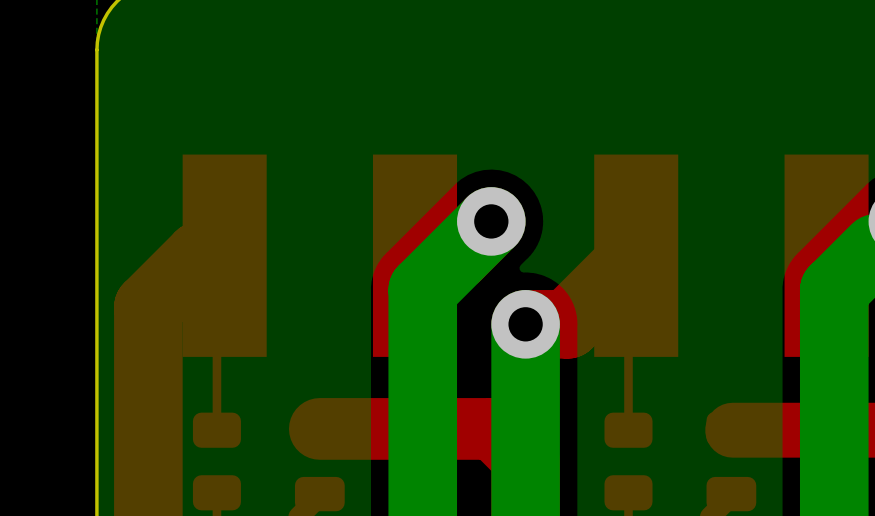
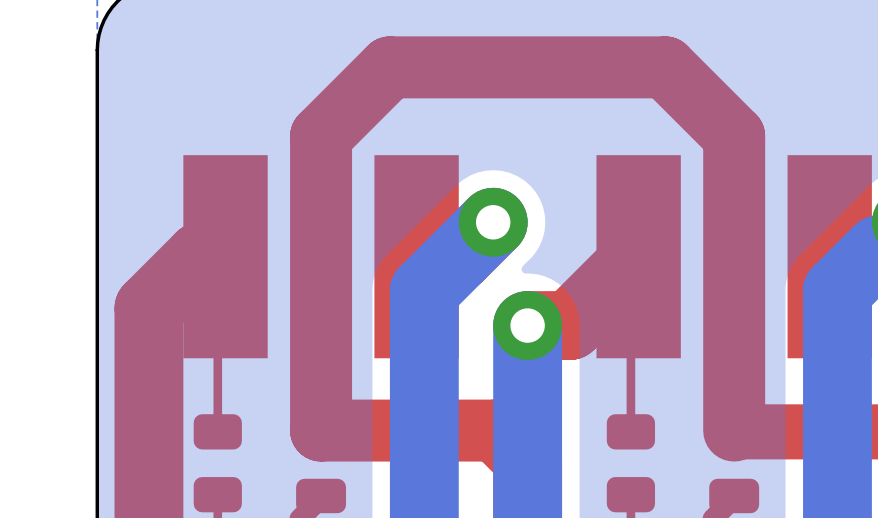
top track: none -> (734, 430) (734, 136) (665, 67) (389, 67) (321, 136) (321, 430)

